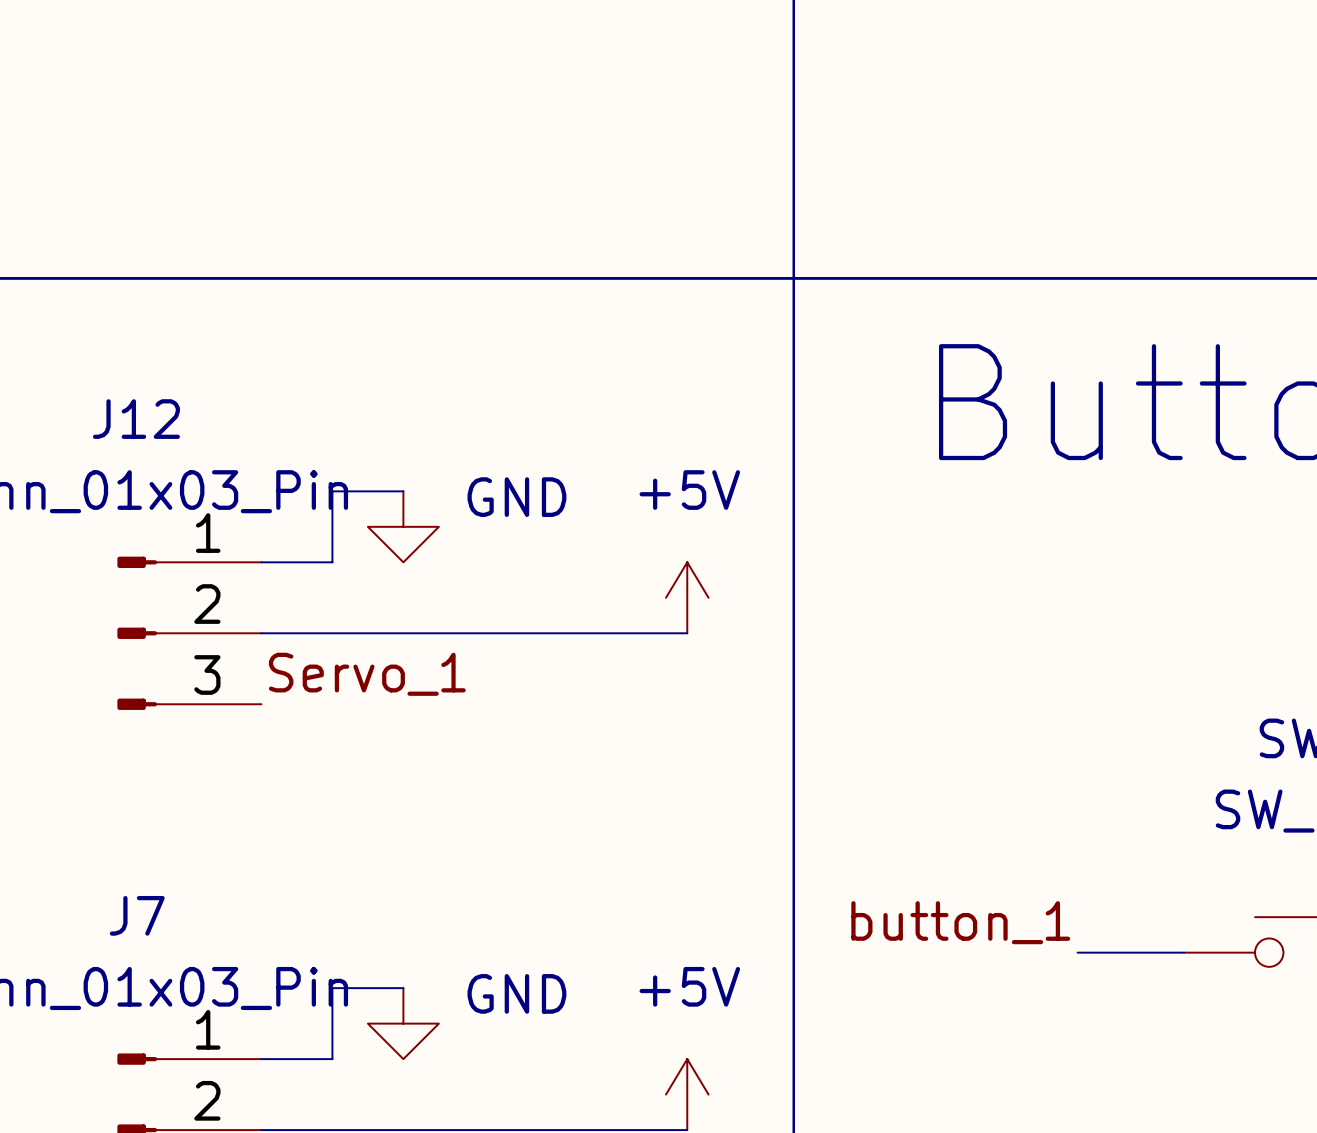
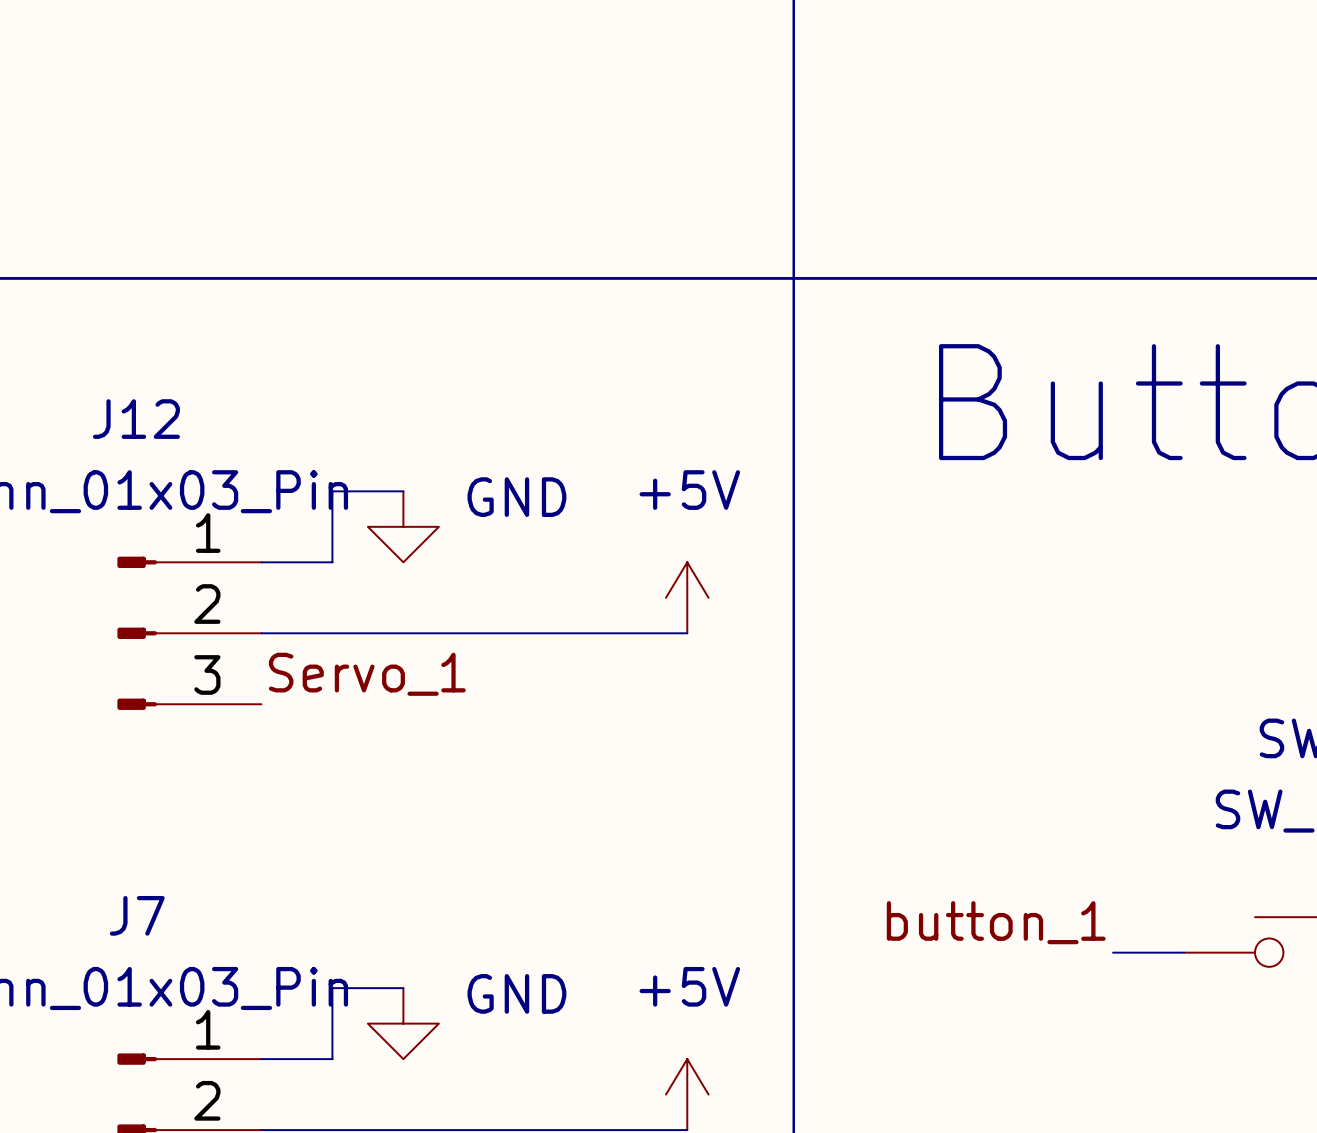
label position: button_1 (960, 922) -> button_1 (996, 922)
wire: (1077, 952) (1113, 952) -> none

